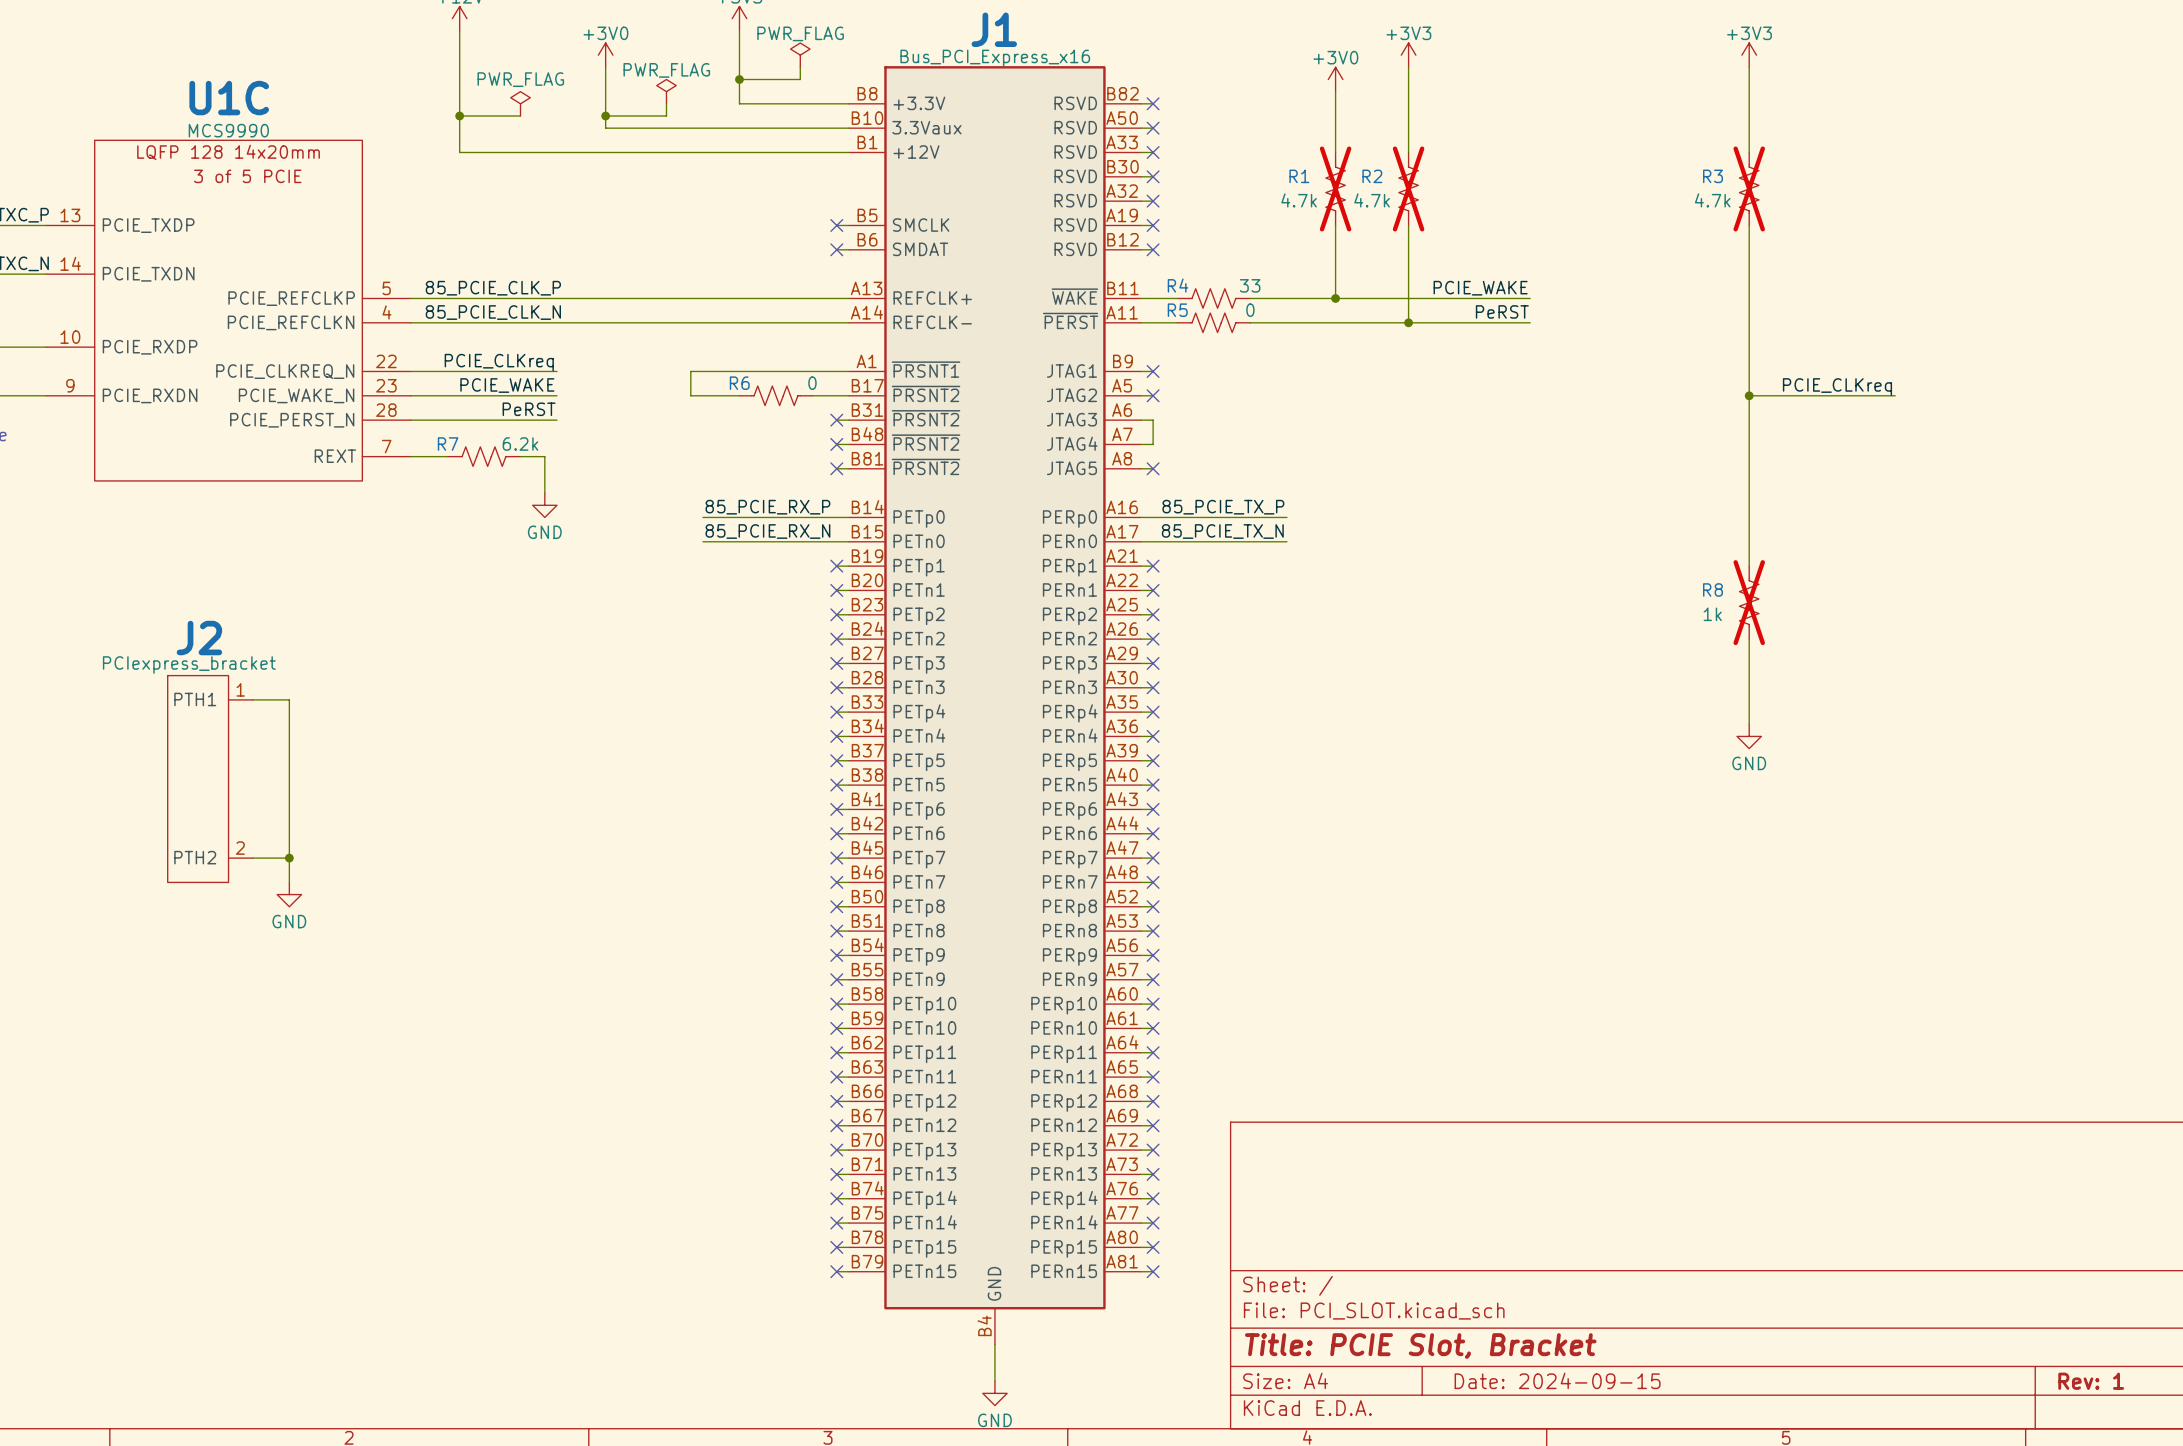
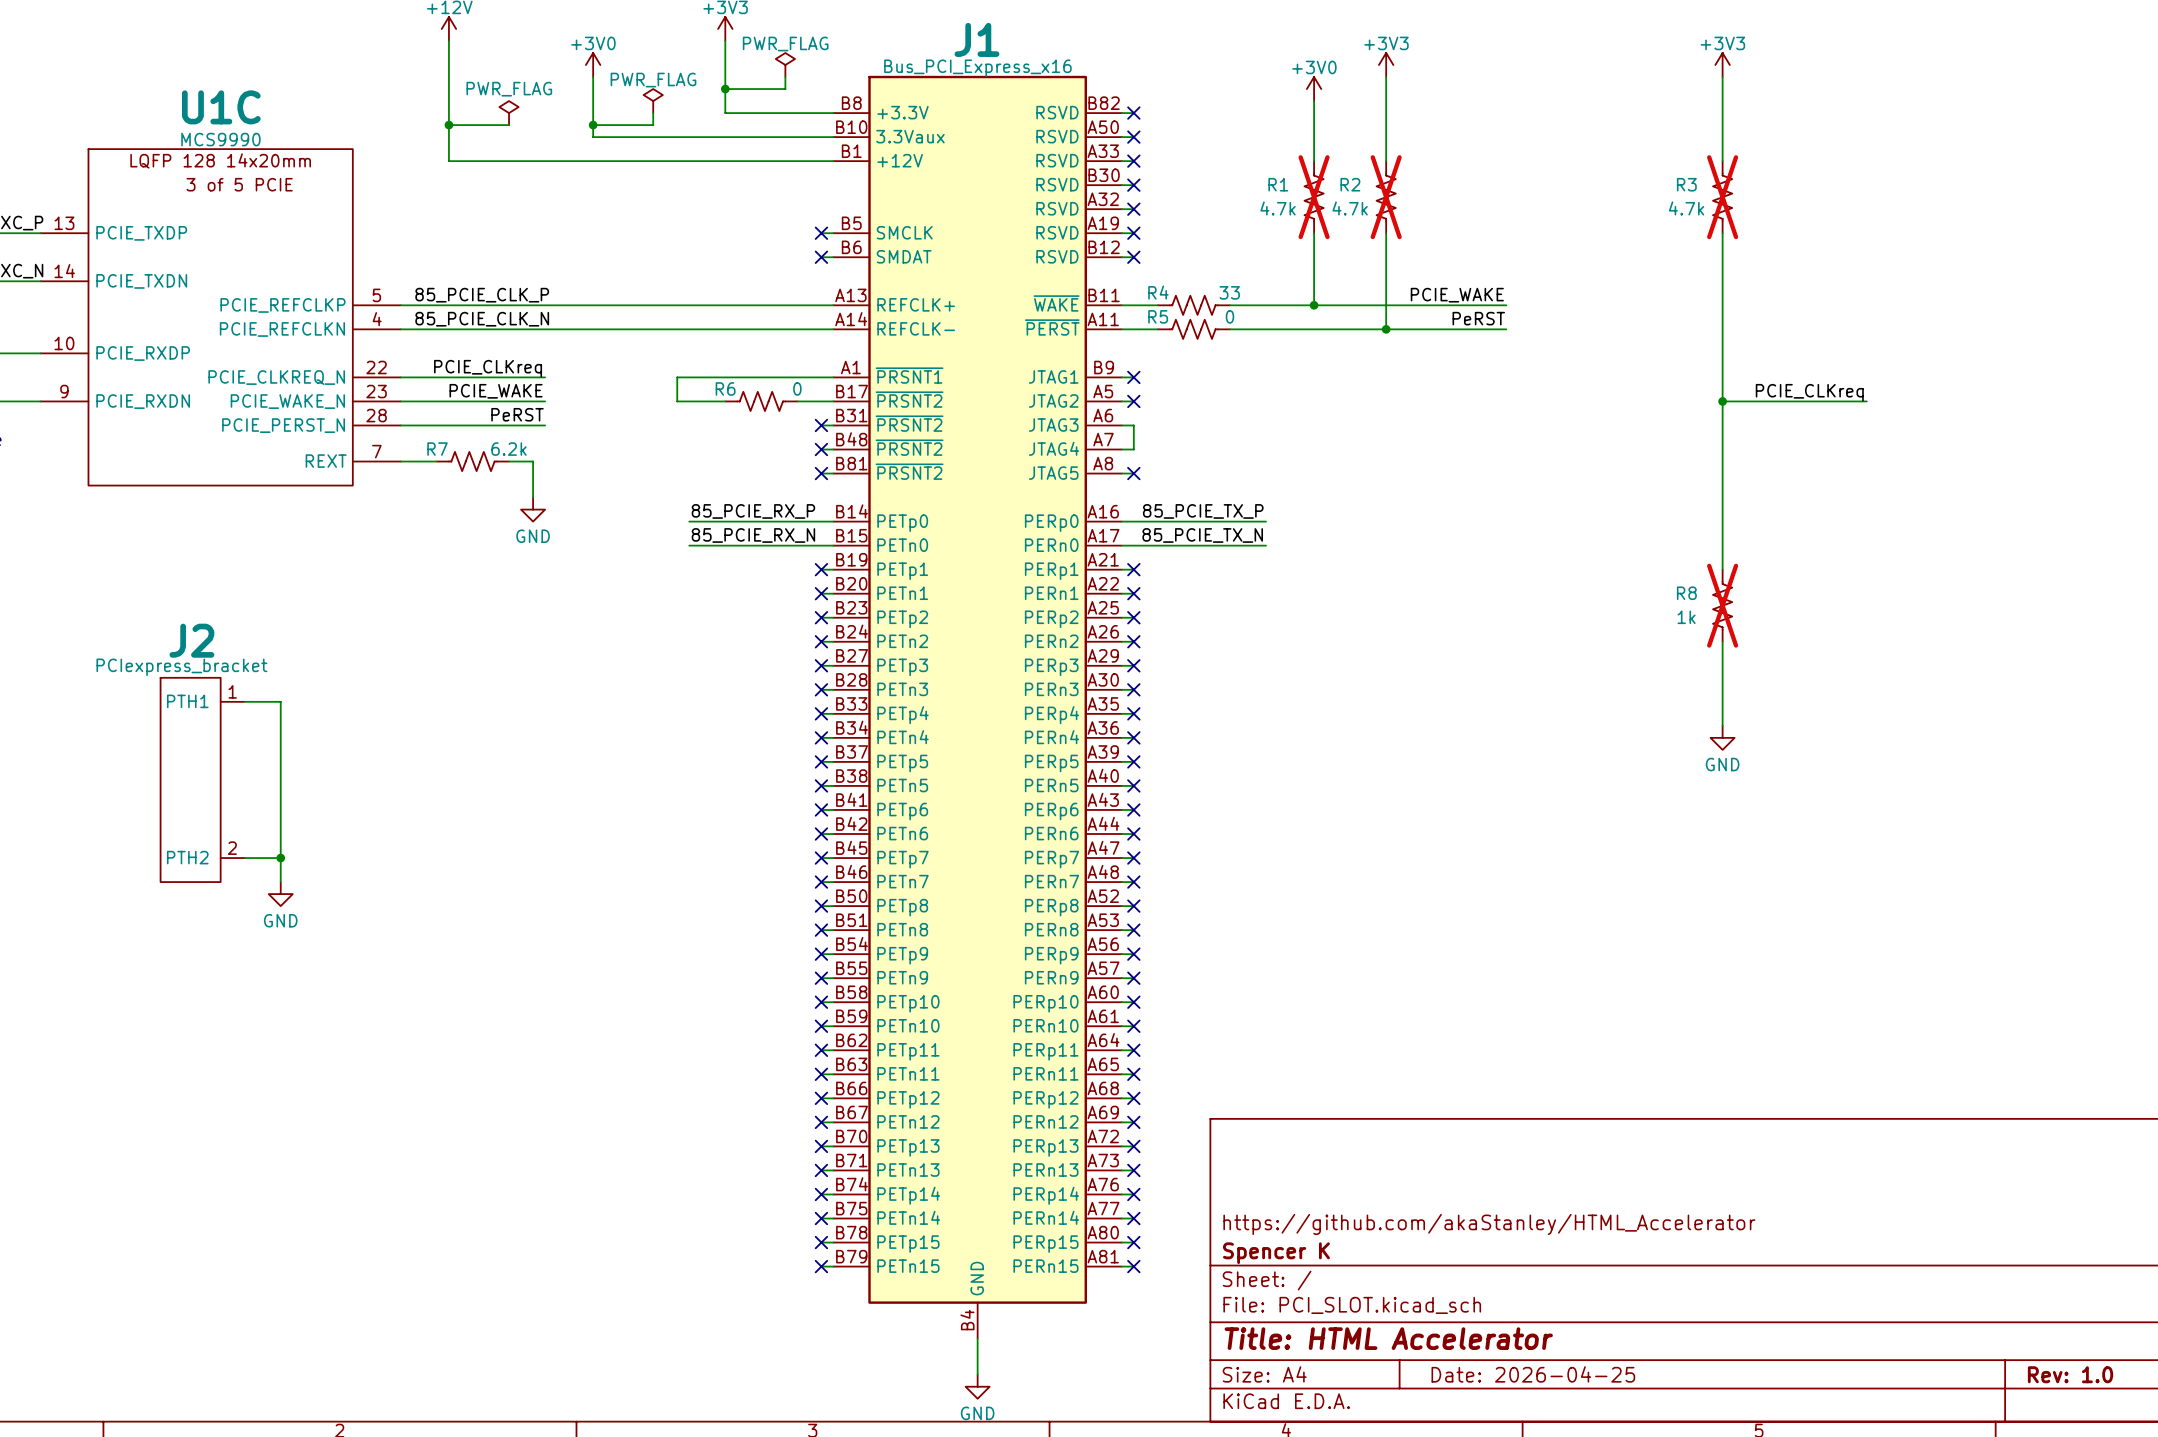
title block: none -> https://github.com/akaStanley/HTML_Accelerator (1489, 1224)
title block: none -> Spencer K (1276, 1253)
title block: Title: PCIE Slot, Bracket (1420, 1346) -> Title: HTML Accelerator (1388, 1338)
title block: Date: 2024-09-15 (1557, 1380) -> Date: 2026-04-25 (1533, 1374)
title block: Rev: 1 (2091, 1381) -> Rev: 1.0 (2070, 1374)

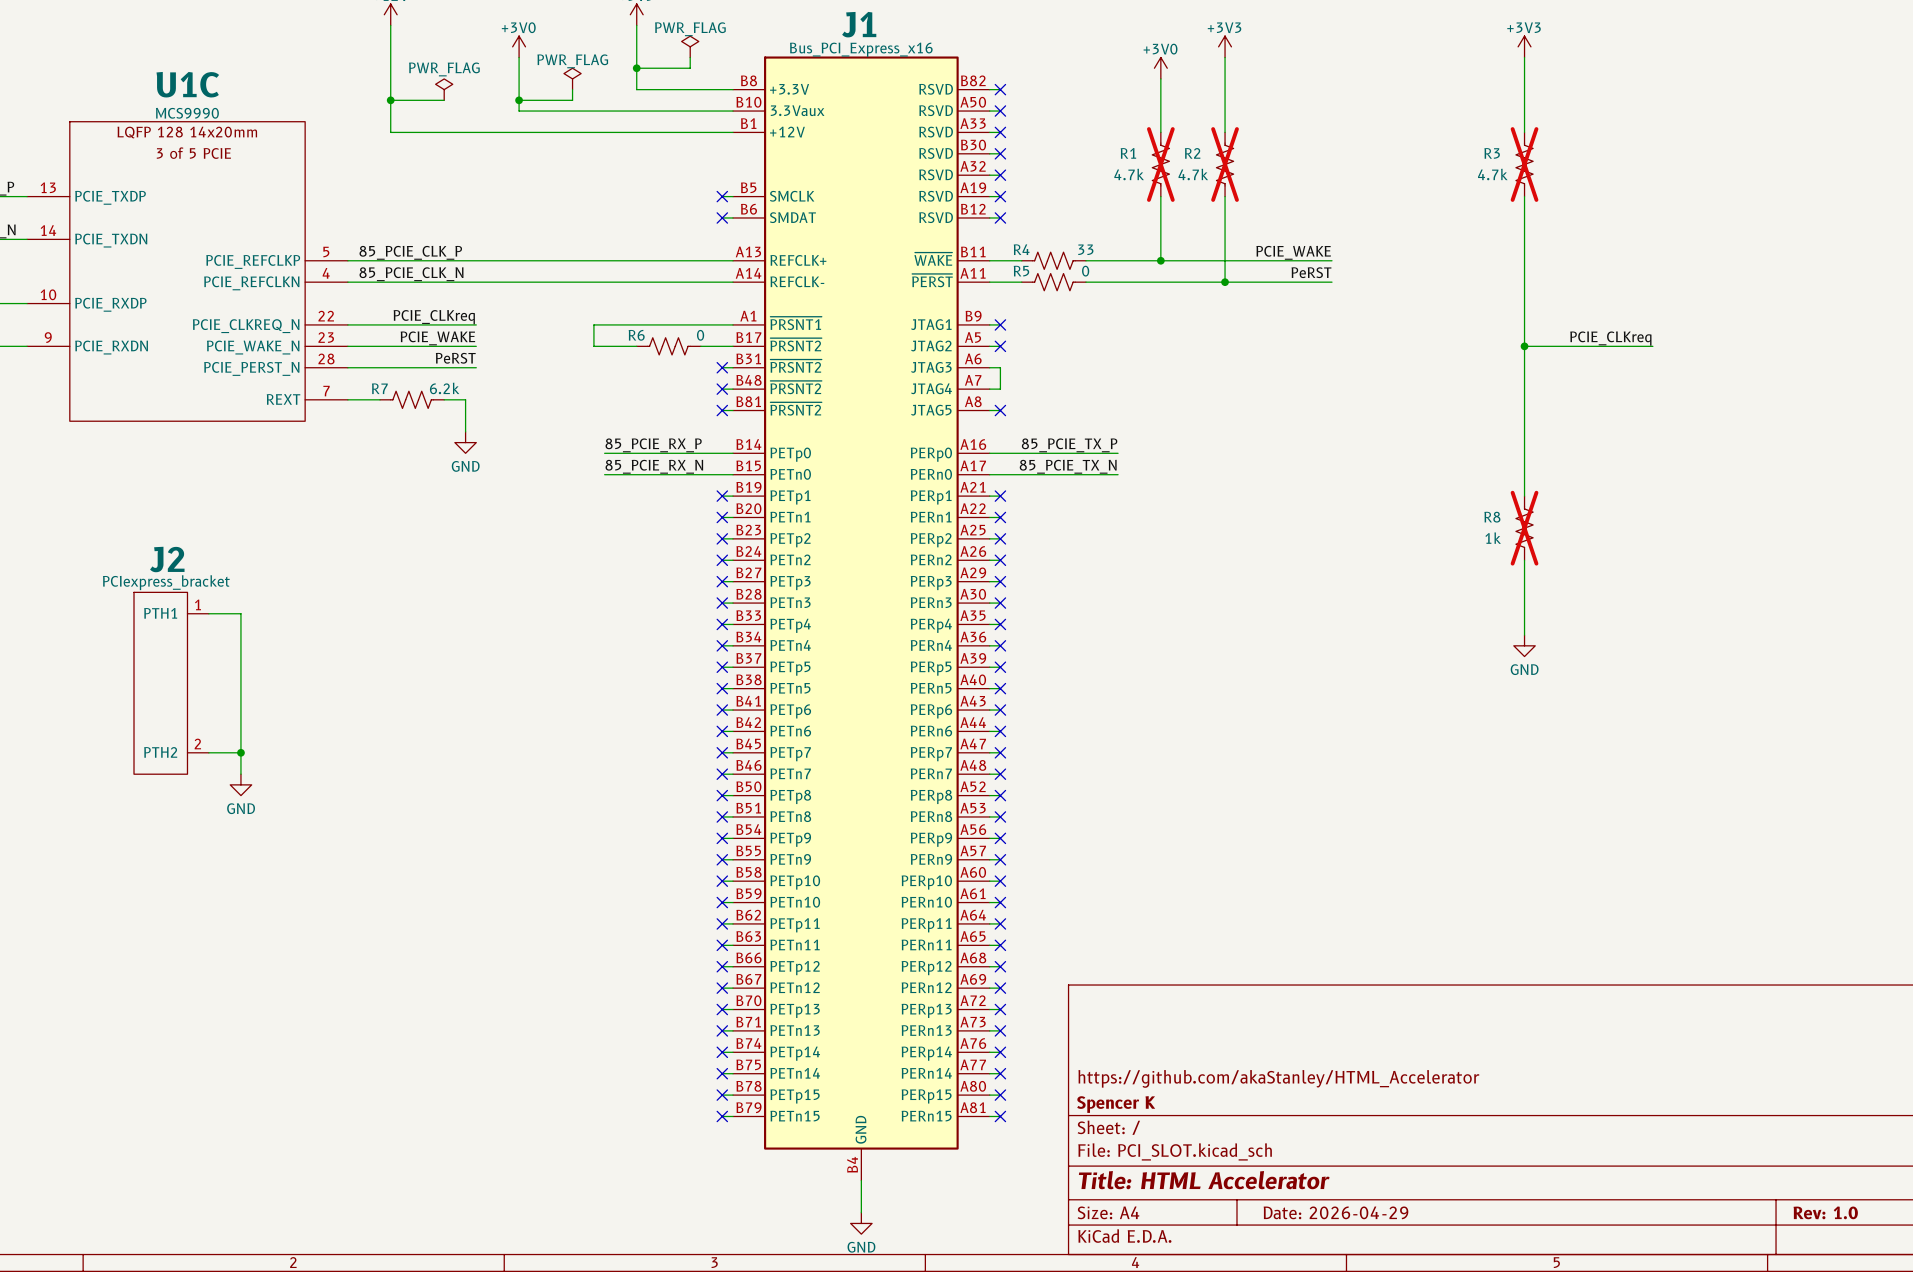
title block: Date: 2026-04-25 (1533, 1374) -> Date: 2026-04-29 (1335, 1212)

